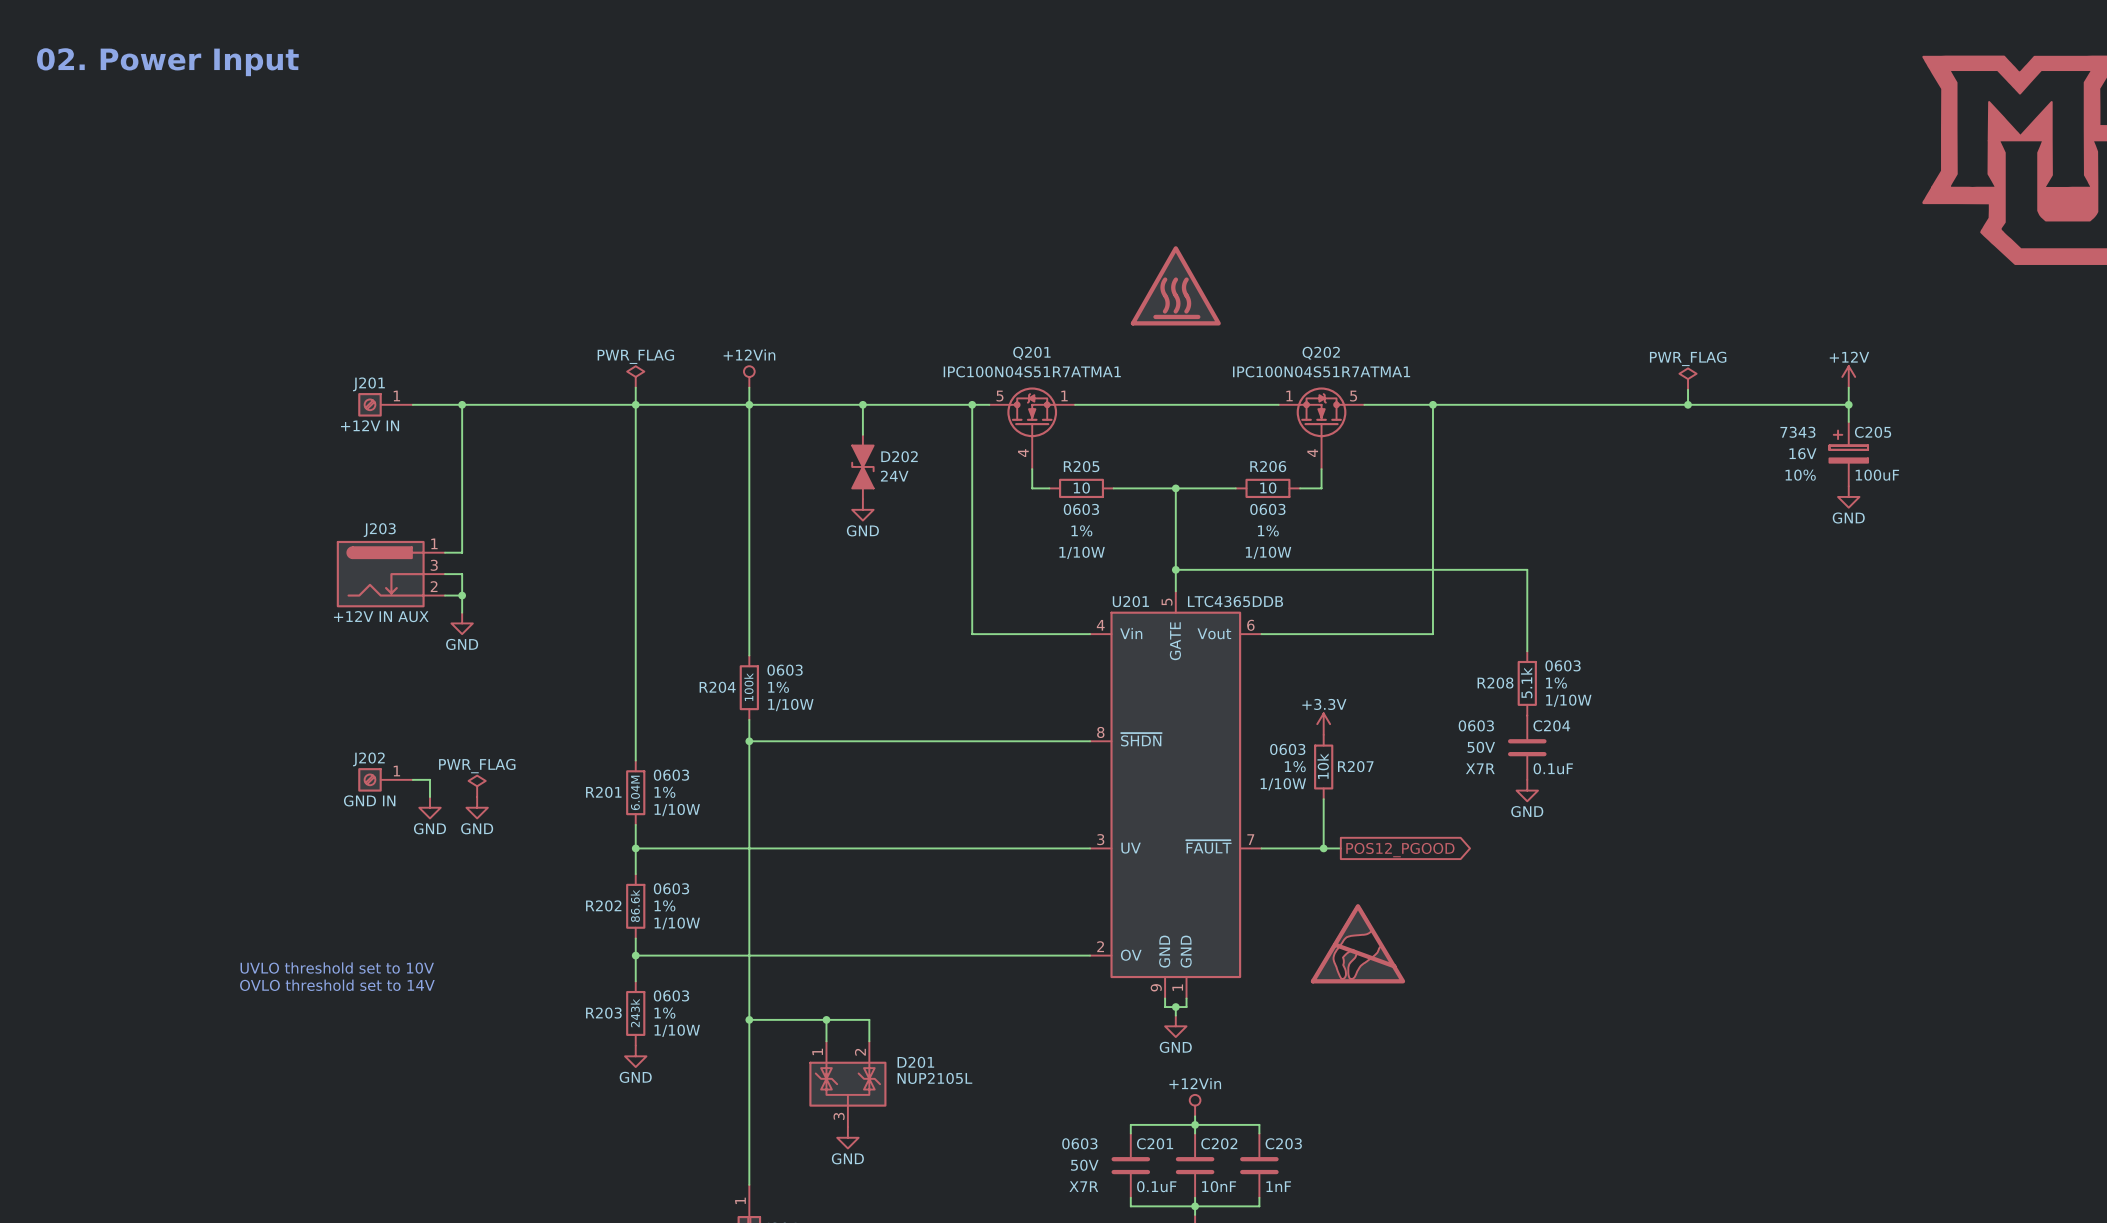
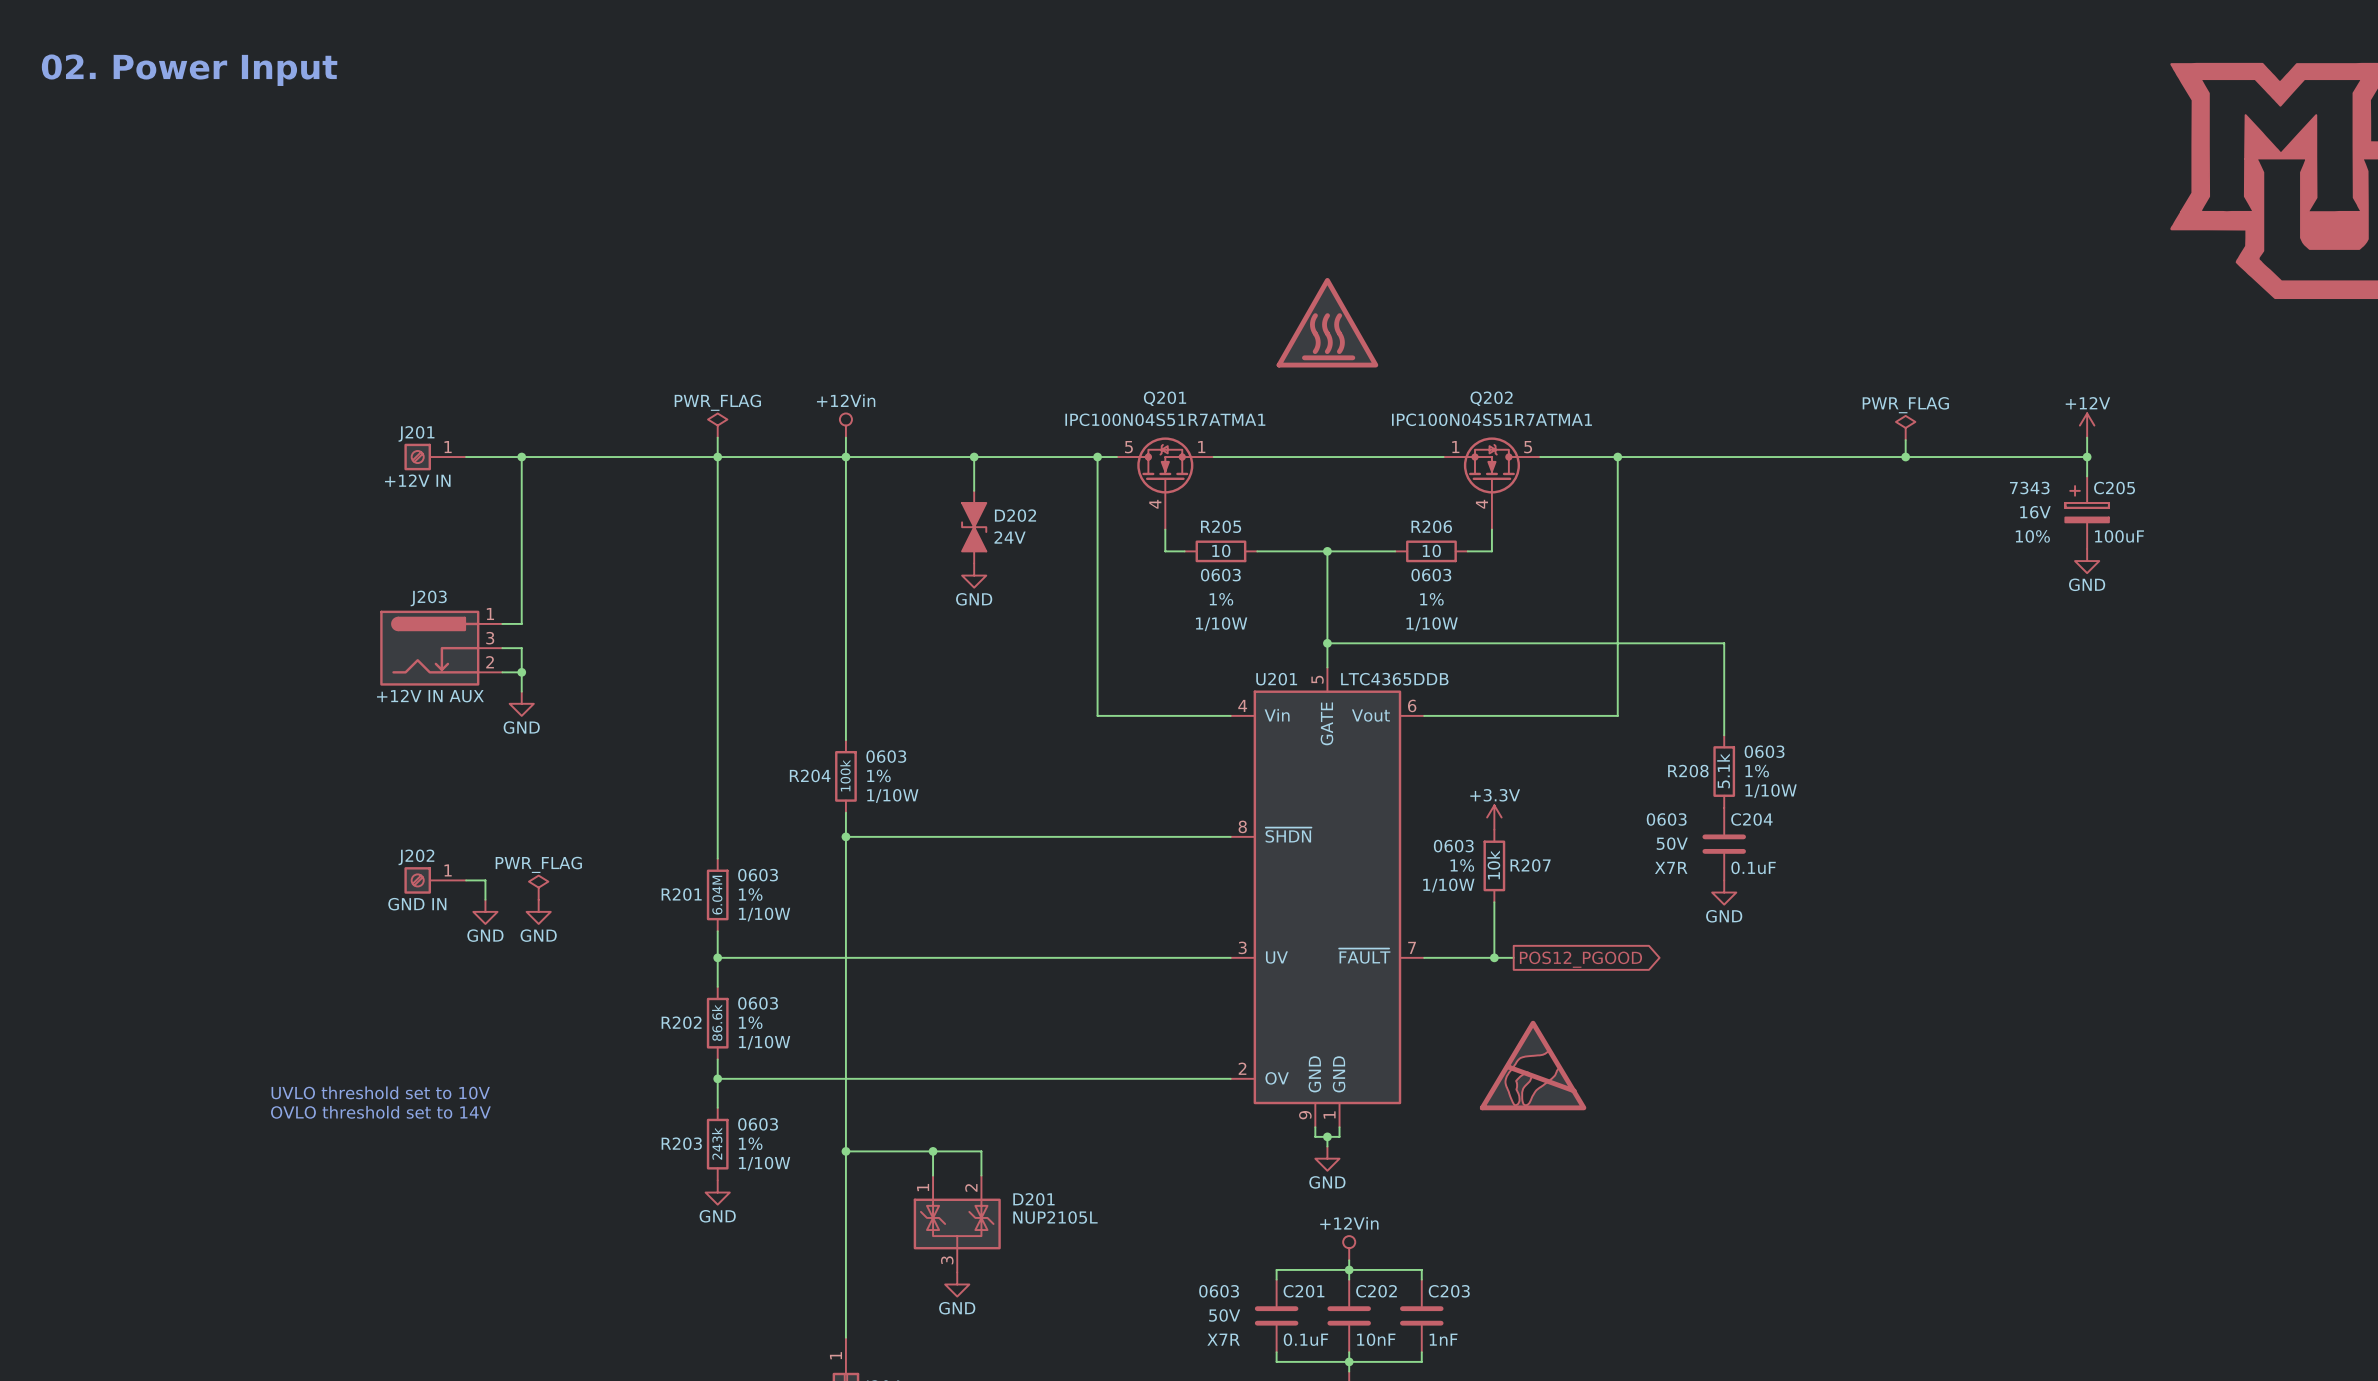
Q201 symbol: [989, 387, 1076, 470] -> [1116, 437, 1214, 530]
Q202 symbol: [1278, 387, 1365, 470] -> [1443, 437, 1541, 530]

